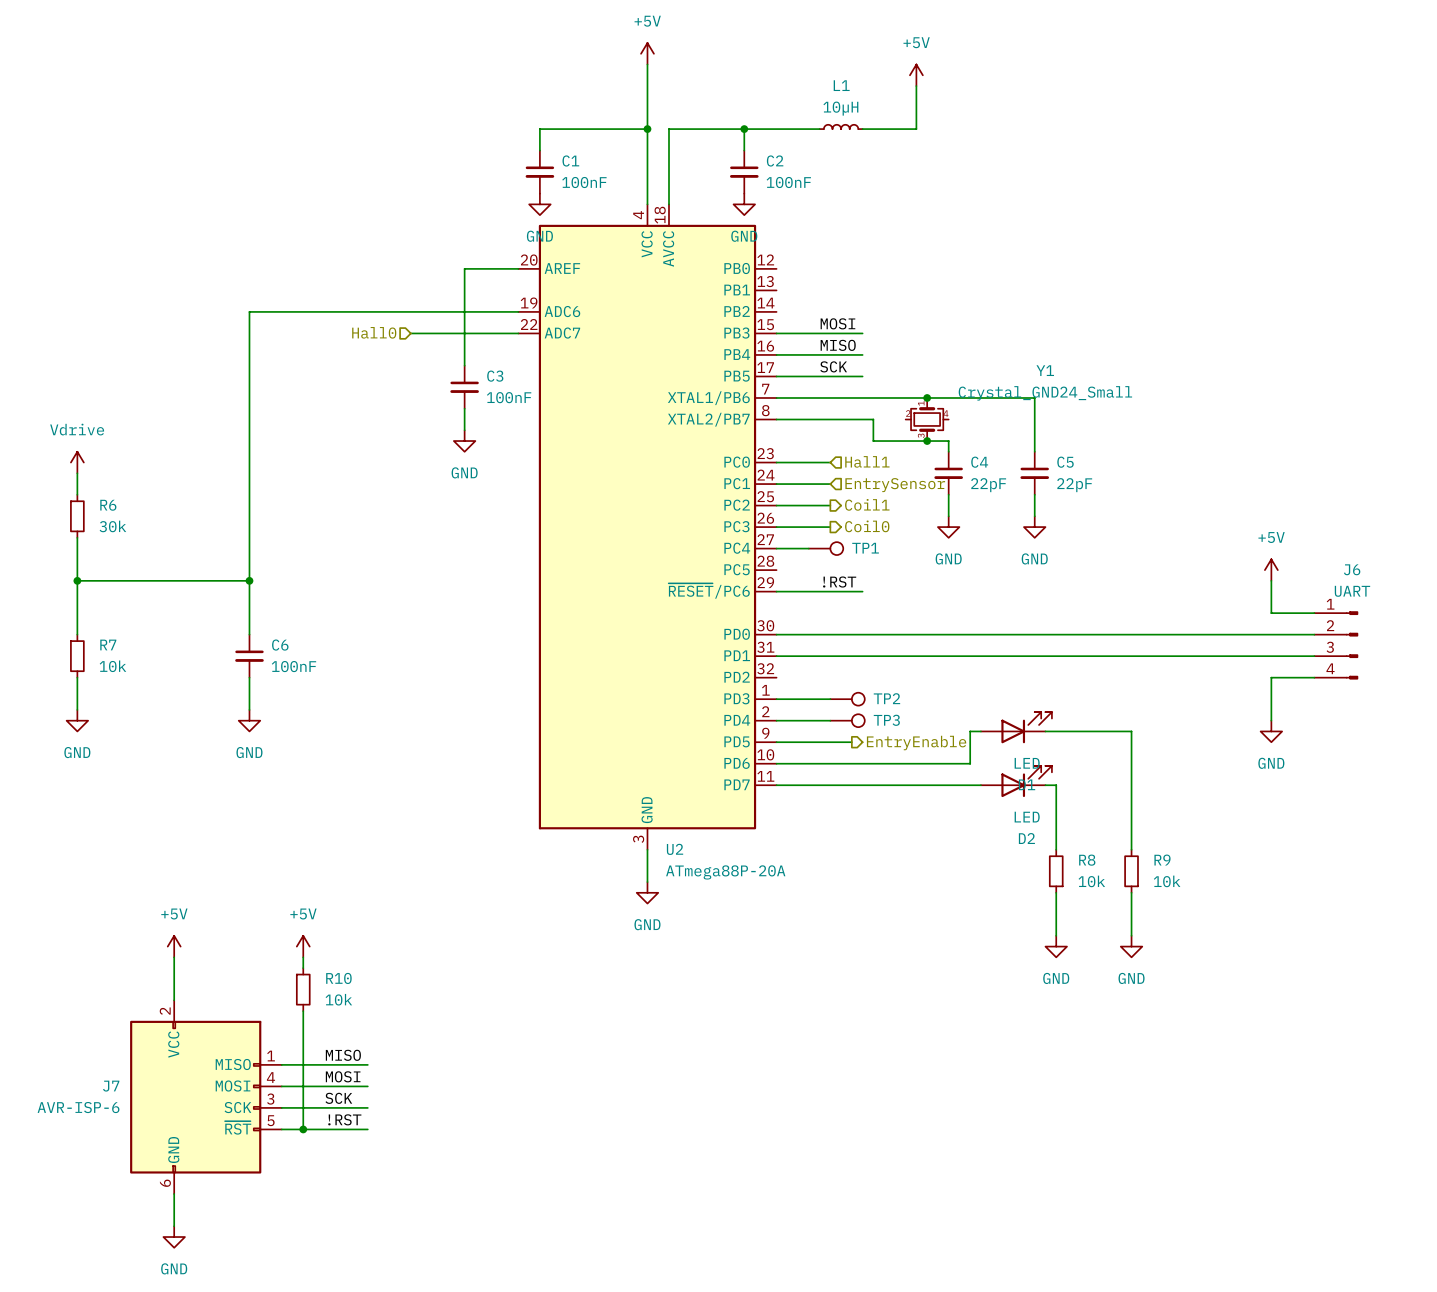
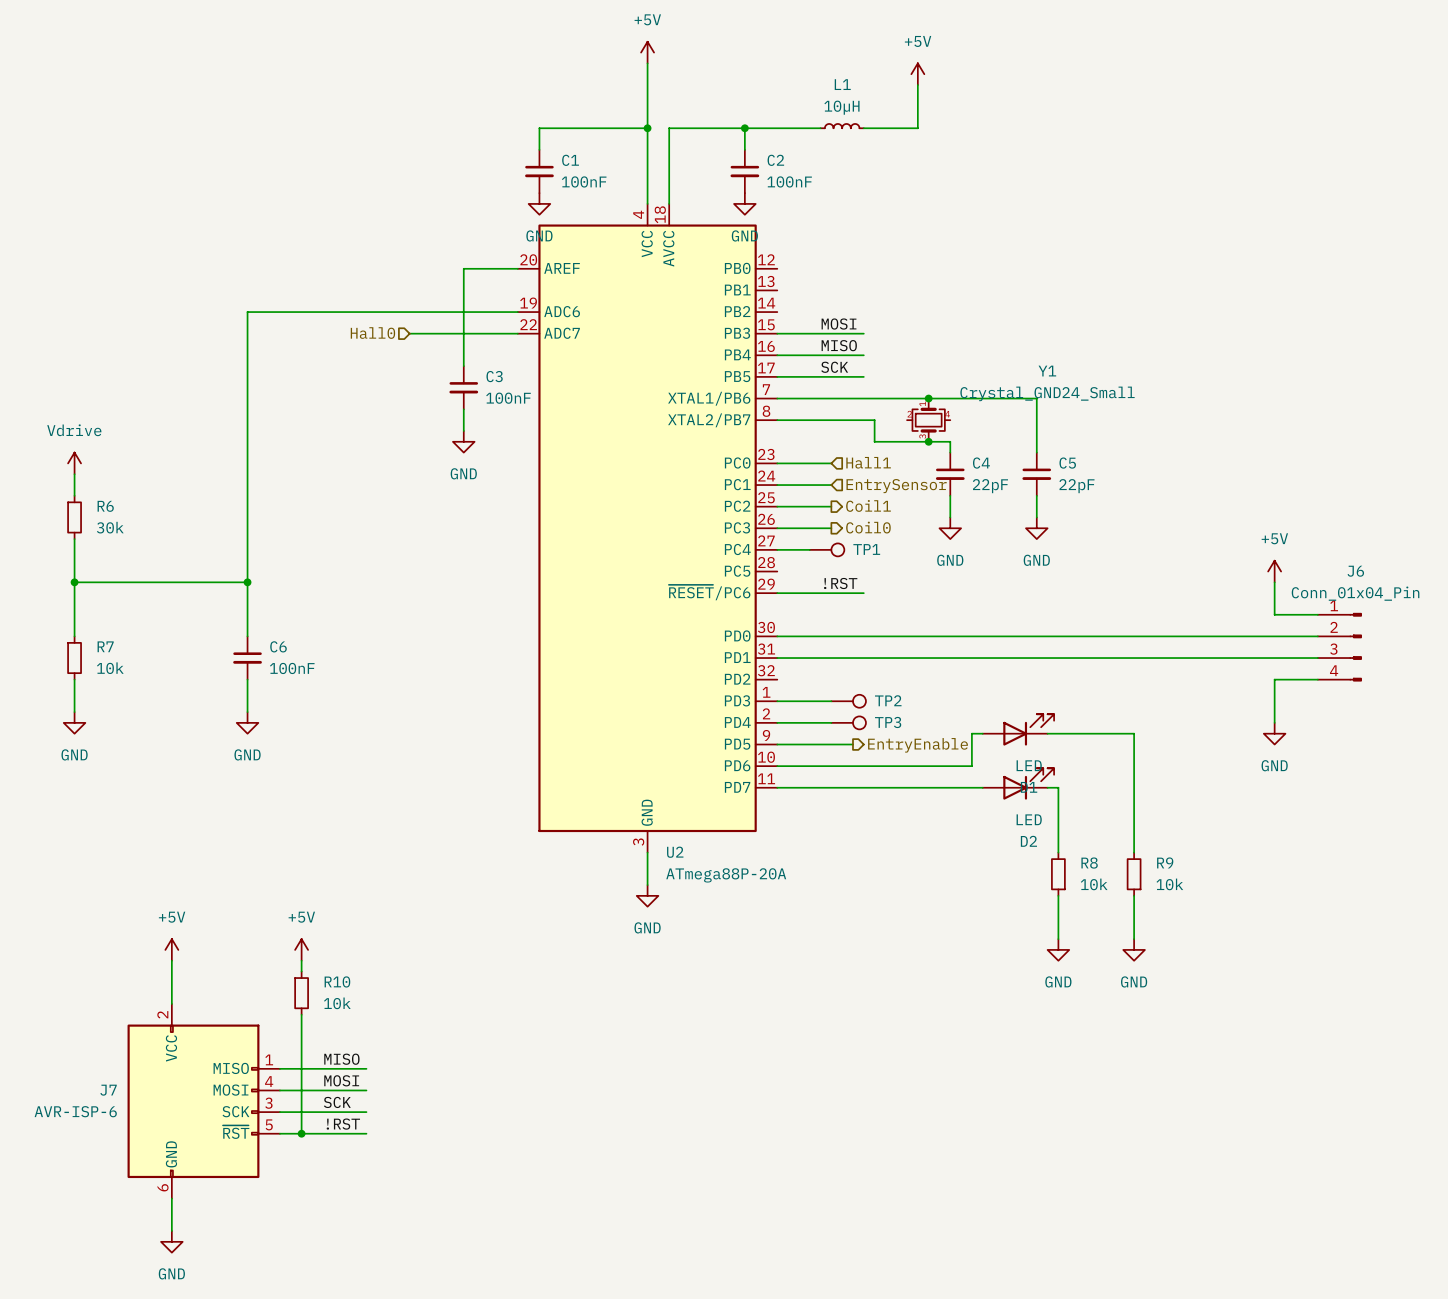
J6 value: UART (1352, 591) -> Conn_01x04_Pin (1355, 593)

